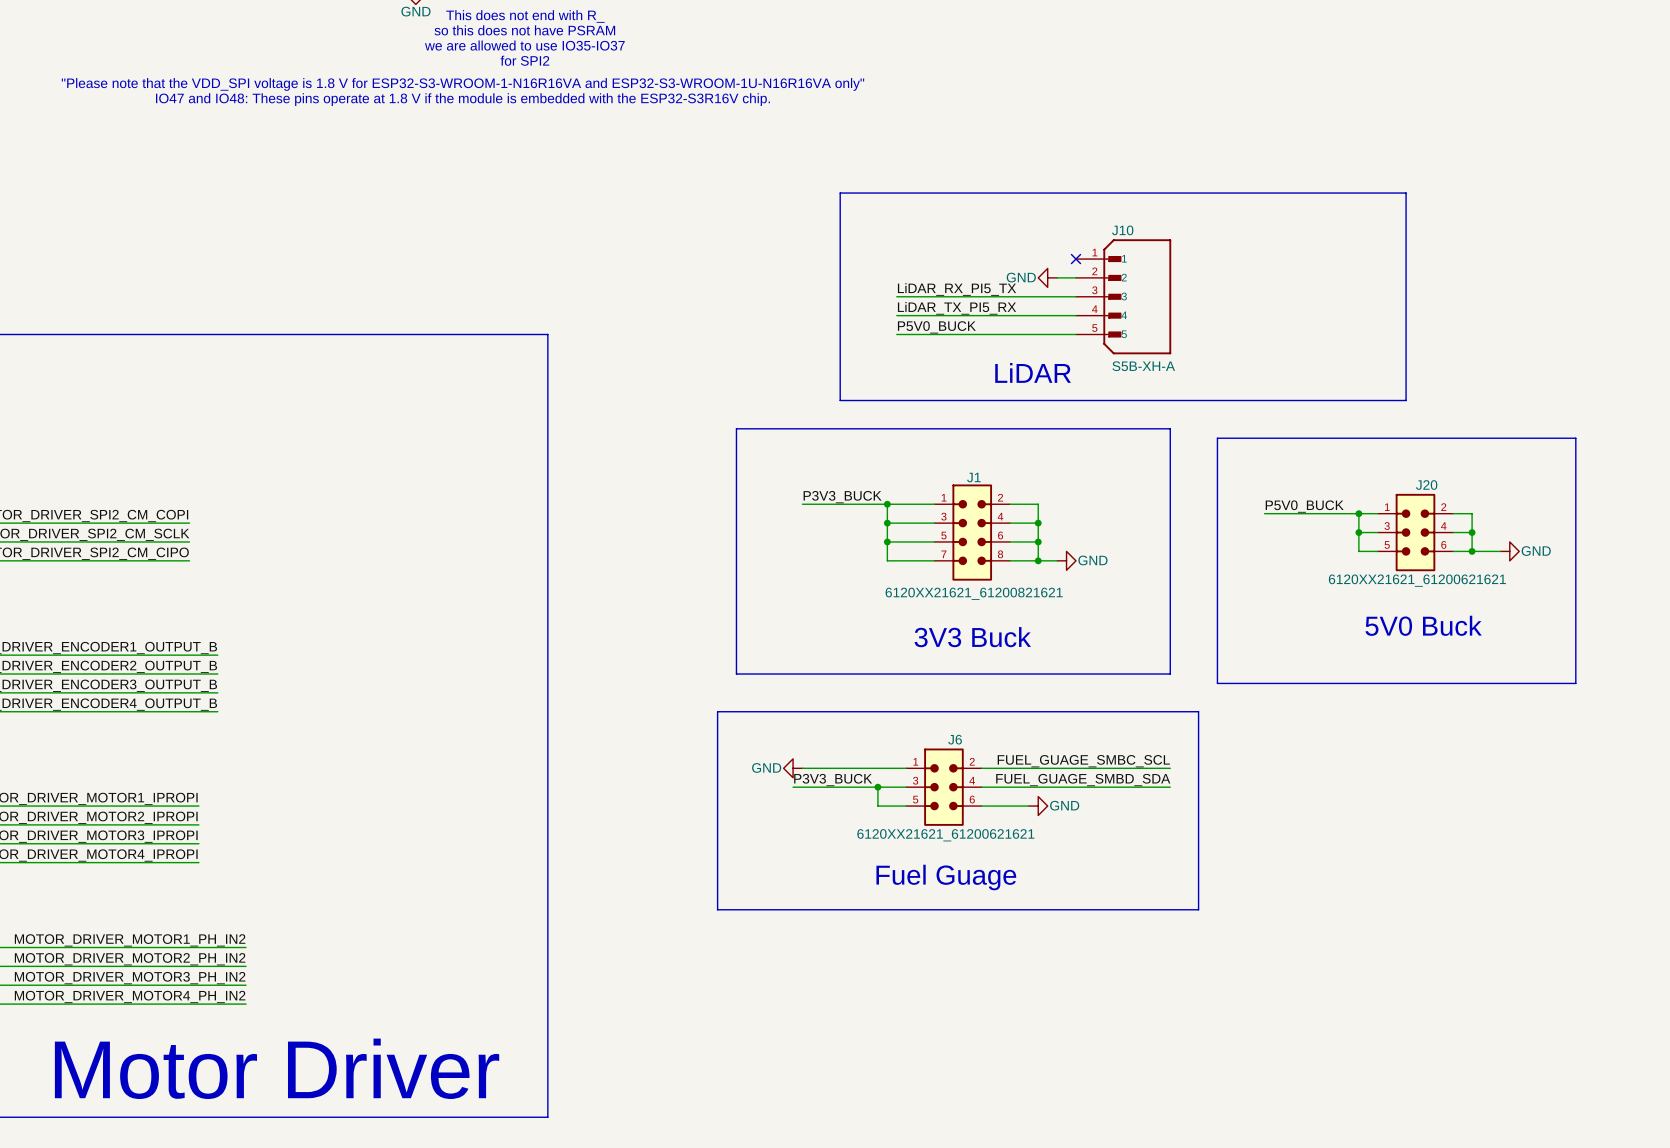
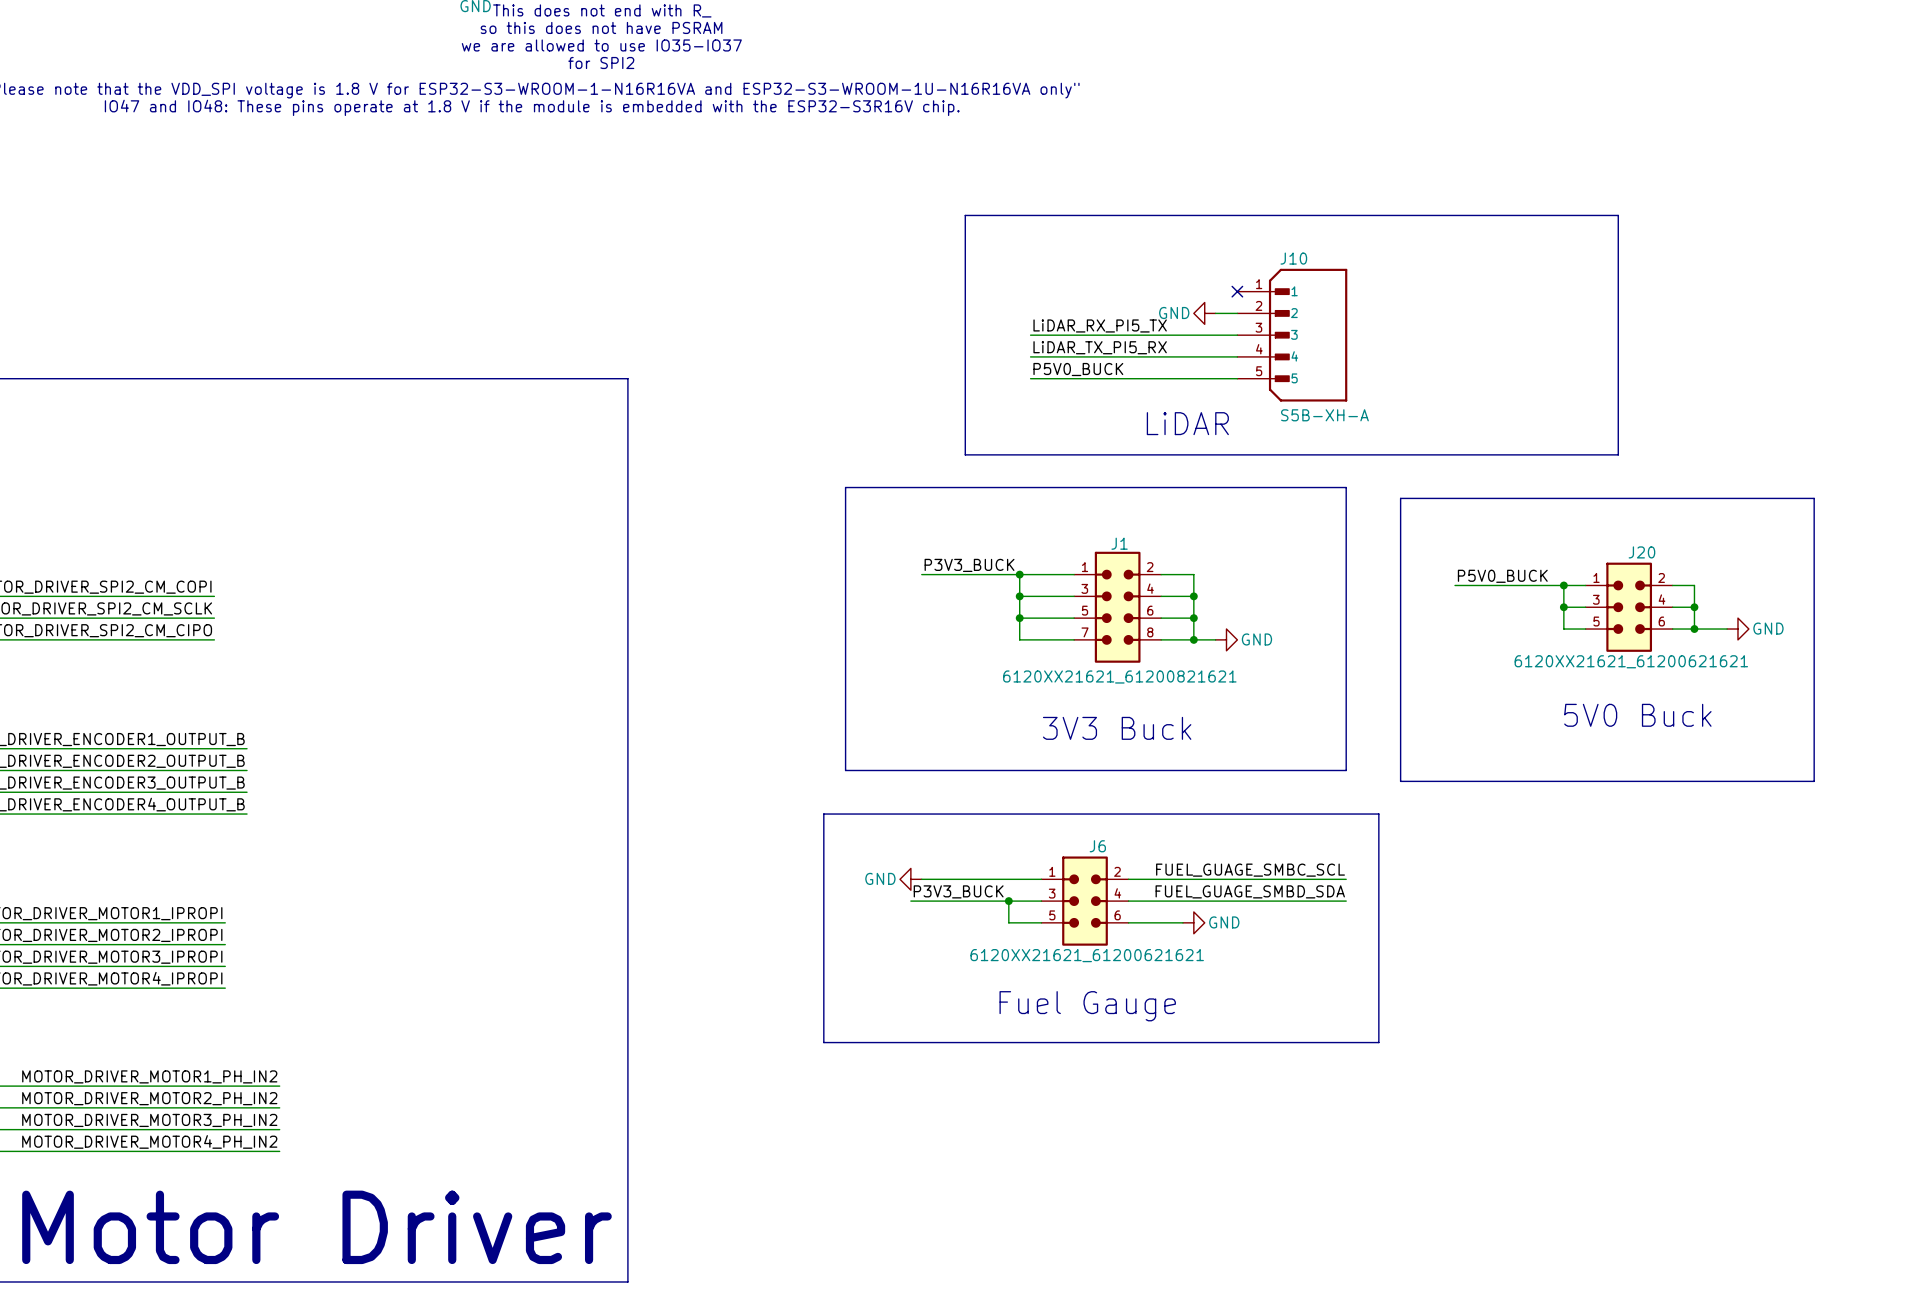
text: Fuel Guage (946, 877) -> Fuel Gauge (1087, 1006)

